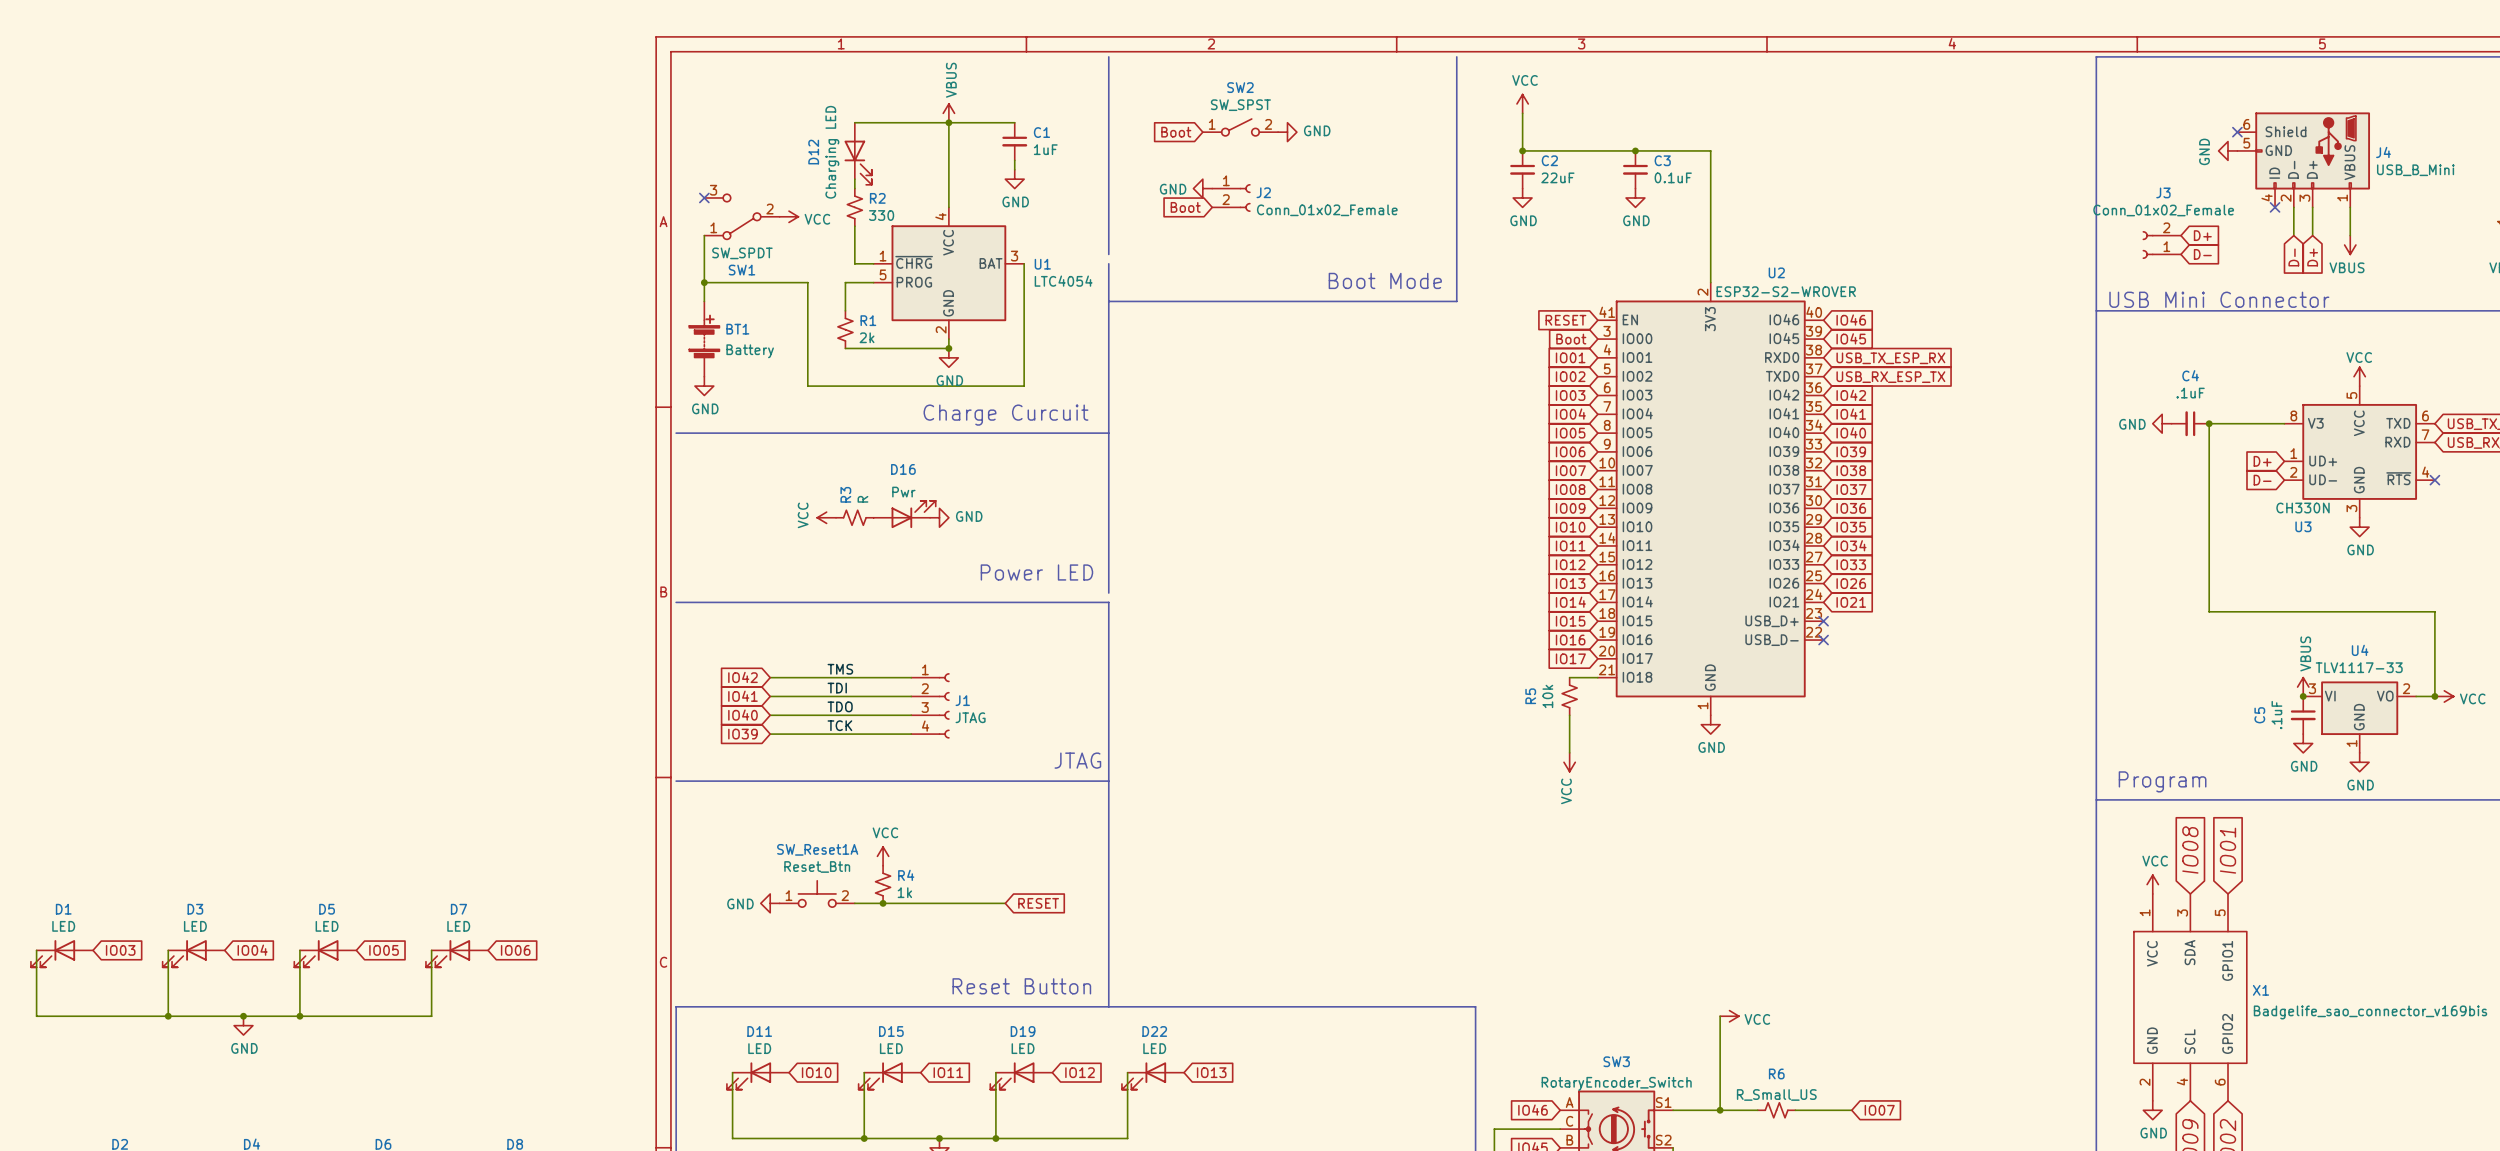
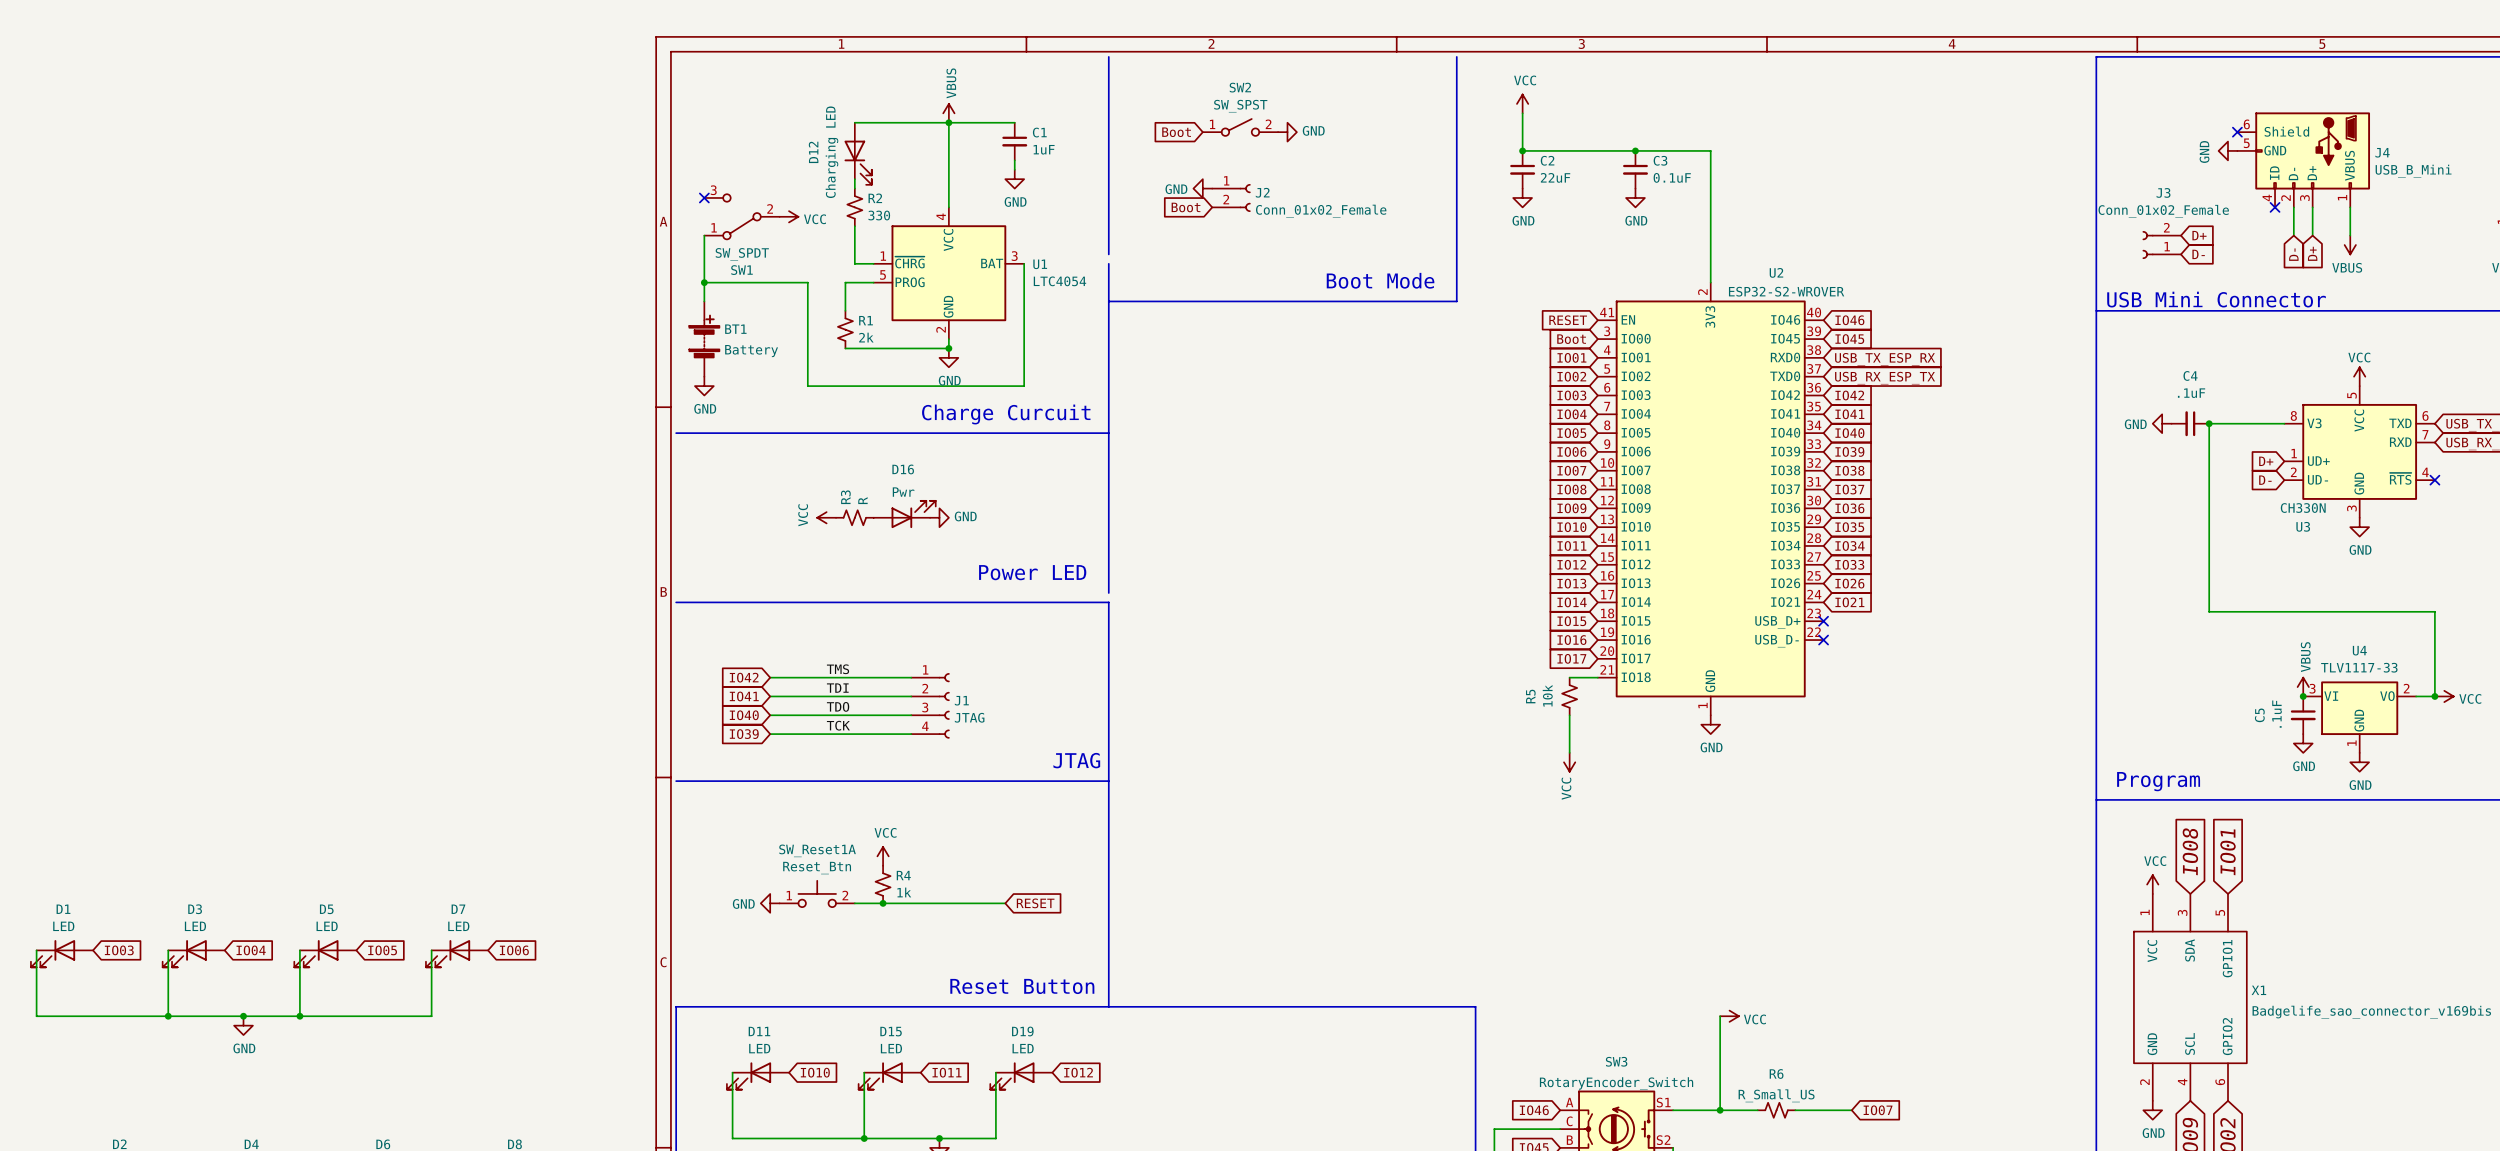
wire: (1127, 1072) (1127, 1138) (995, 1138) -> none
global label: IO13 (1211, 1072) -> none
D22: LED (1152, 1075) -> none
junction: (995, 1138) -> none

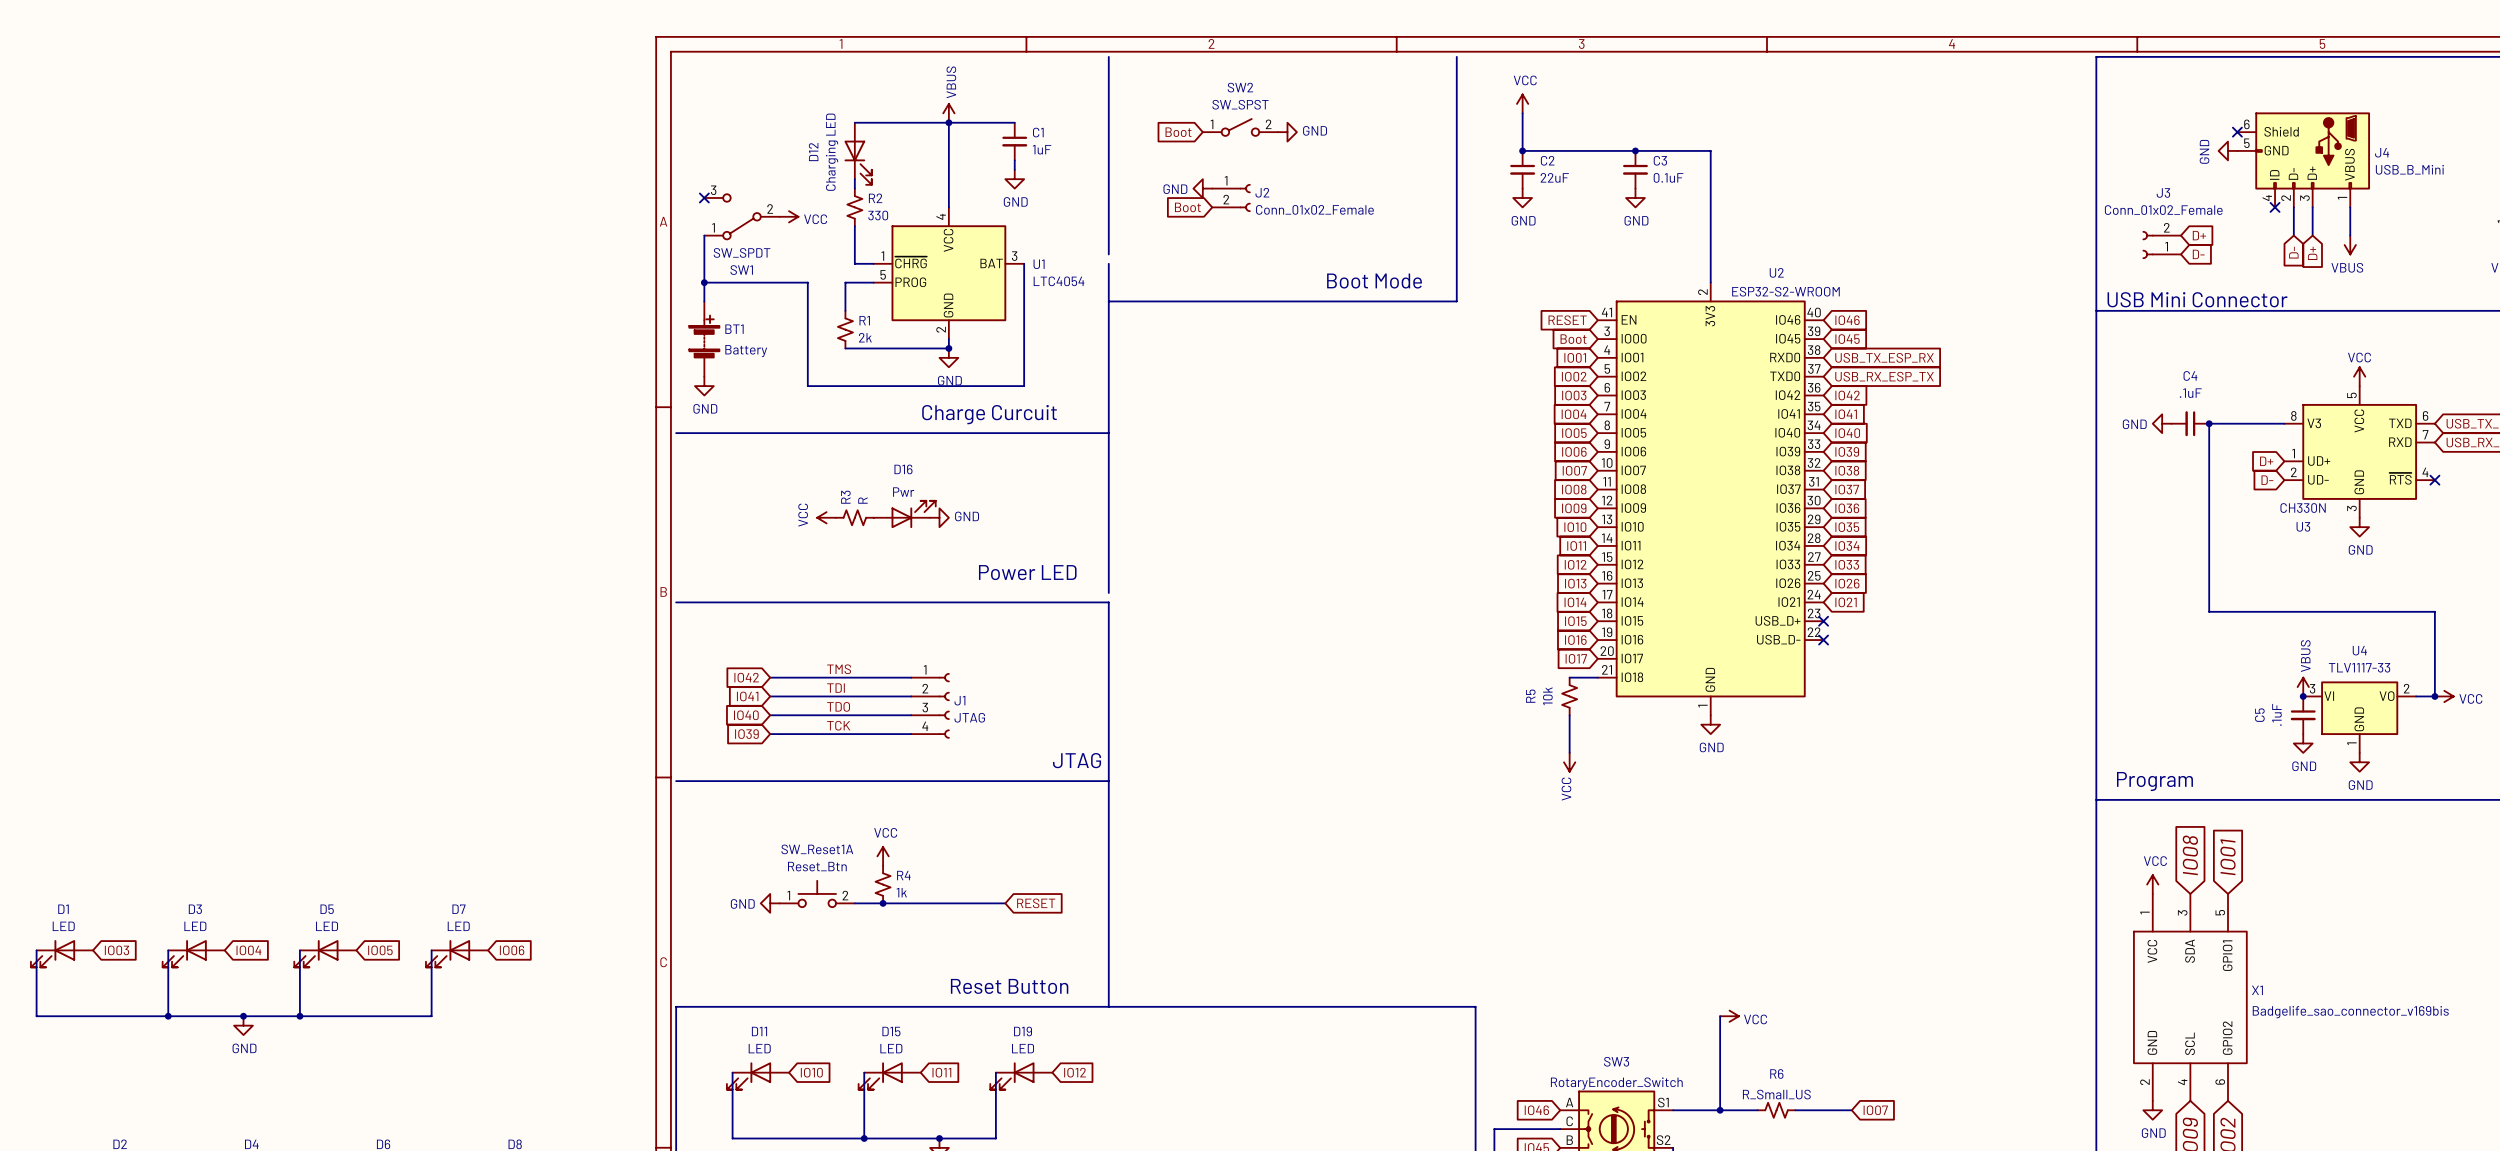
U2 value: ESP32-S2-WROVER (1786, 291) -> ESP32-S2-WROOM (1785, 291)

